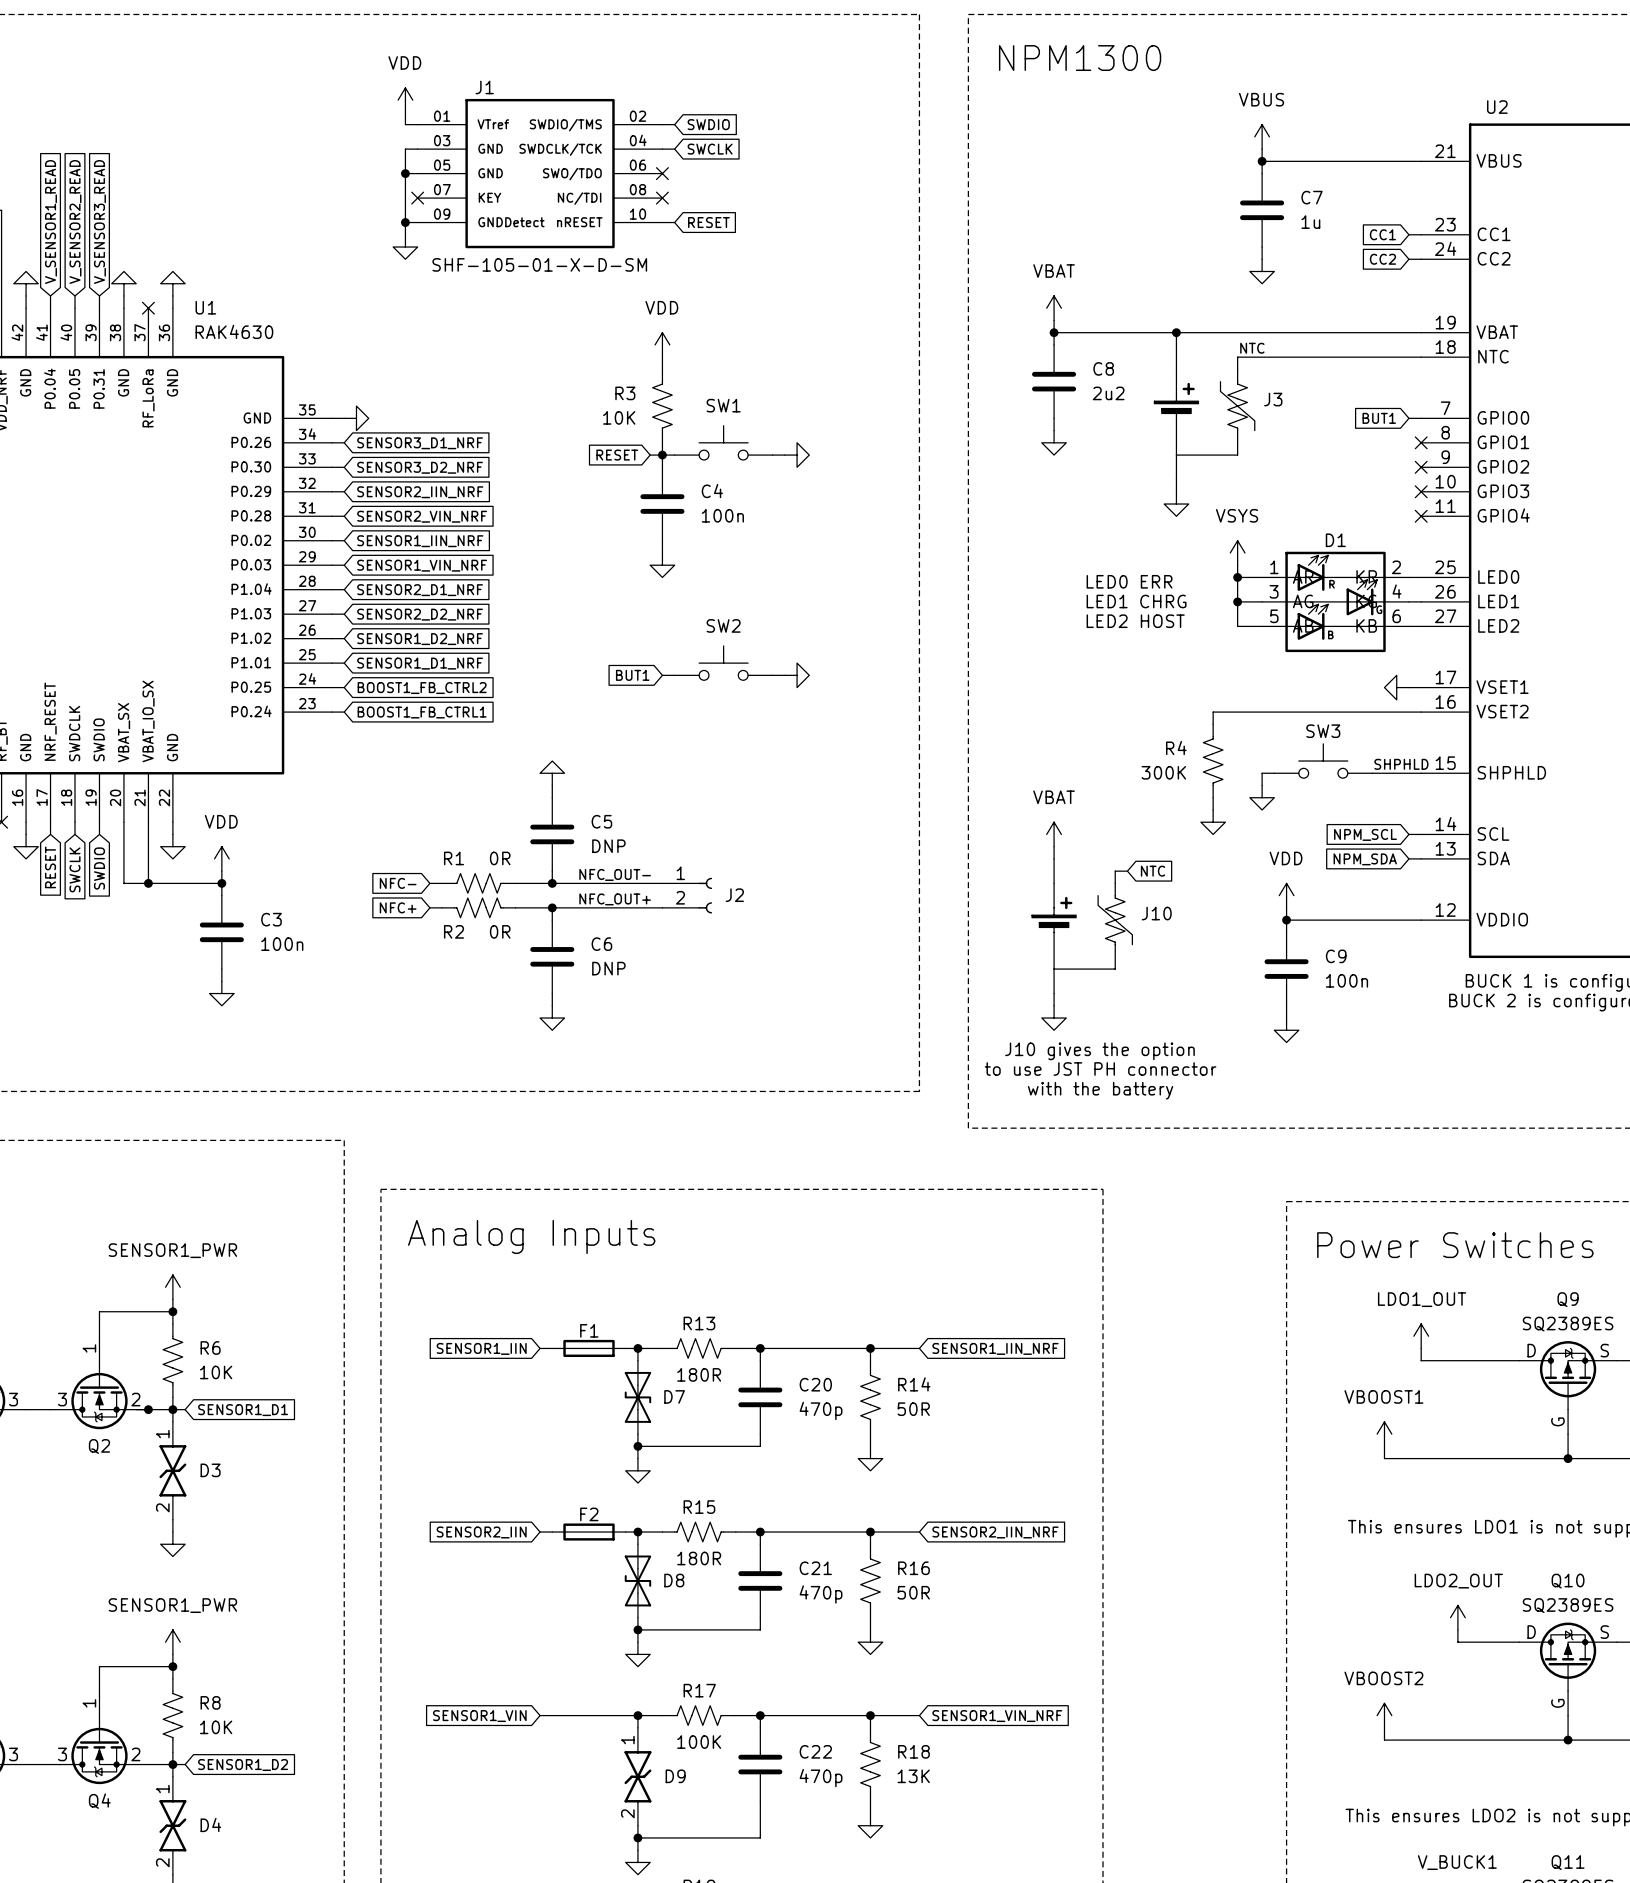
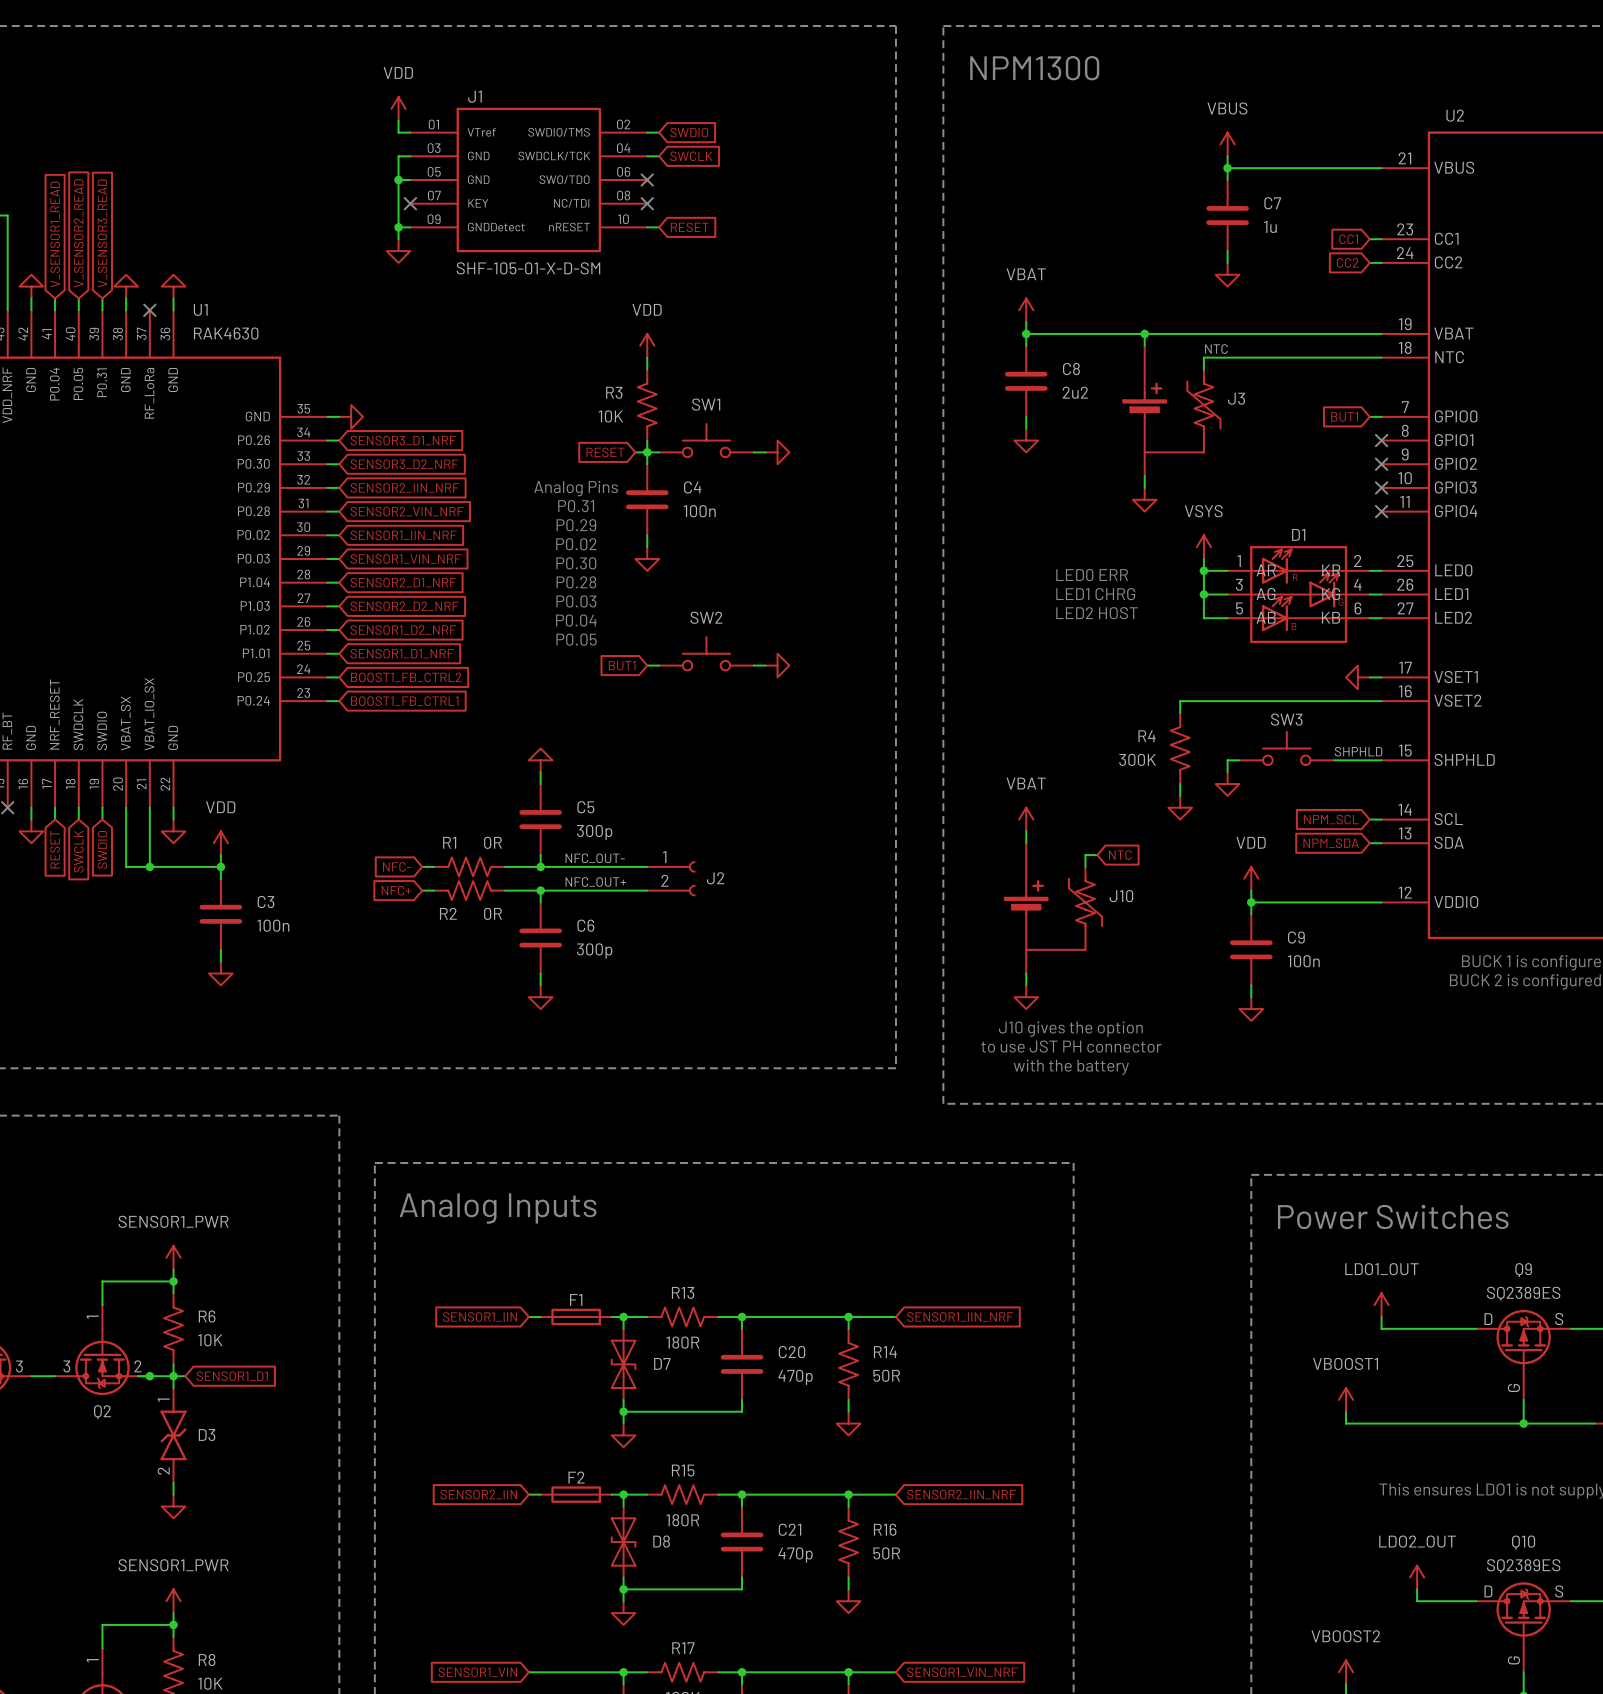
text: none -> Analog Pins (576, 488)
text: none -> P0.31 (576, 506)
text: none -> P0.29 (576, 525)
text: none -> P0.02 (576, 544)
text: none -> P0.30 (576, 563)
text: none -> P0.28 (576, 582)
text: none -> P0.03 (576, 601)
text: none -> P0.04 (576, 620)
text: none -> P0.05 (576, 639)
C5 value: DNP (608, 846) -> 300p (594, 832)
C6 value: DNP (608, 968) -> 300p (594, 950)

